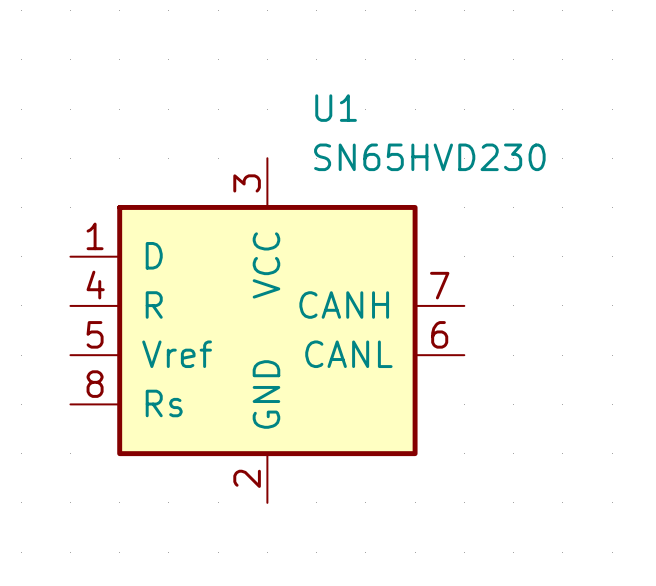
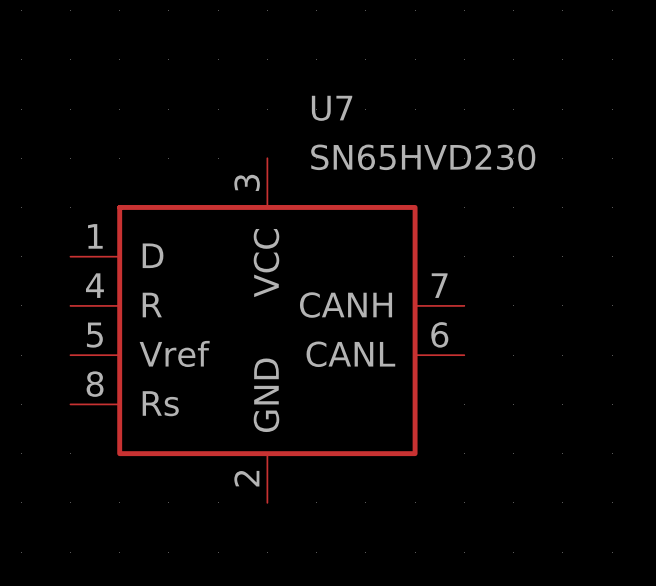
U1 name: U1 (336, 108) -> U7 (332, 108)

